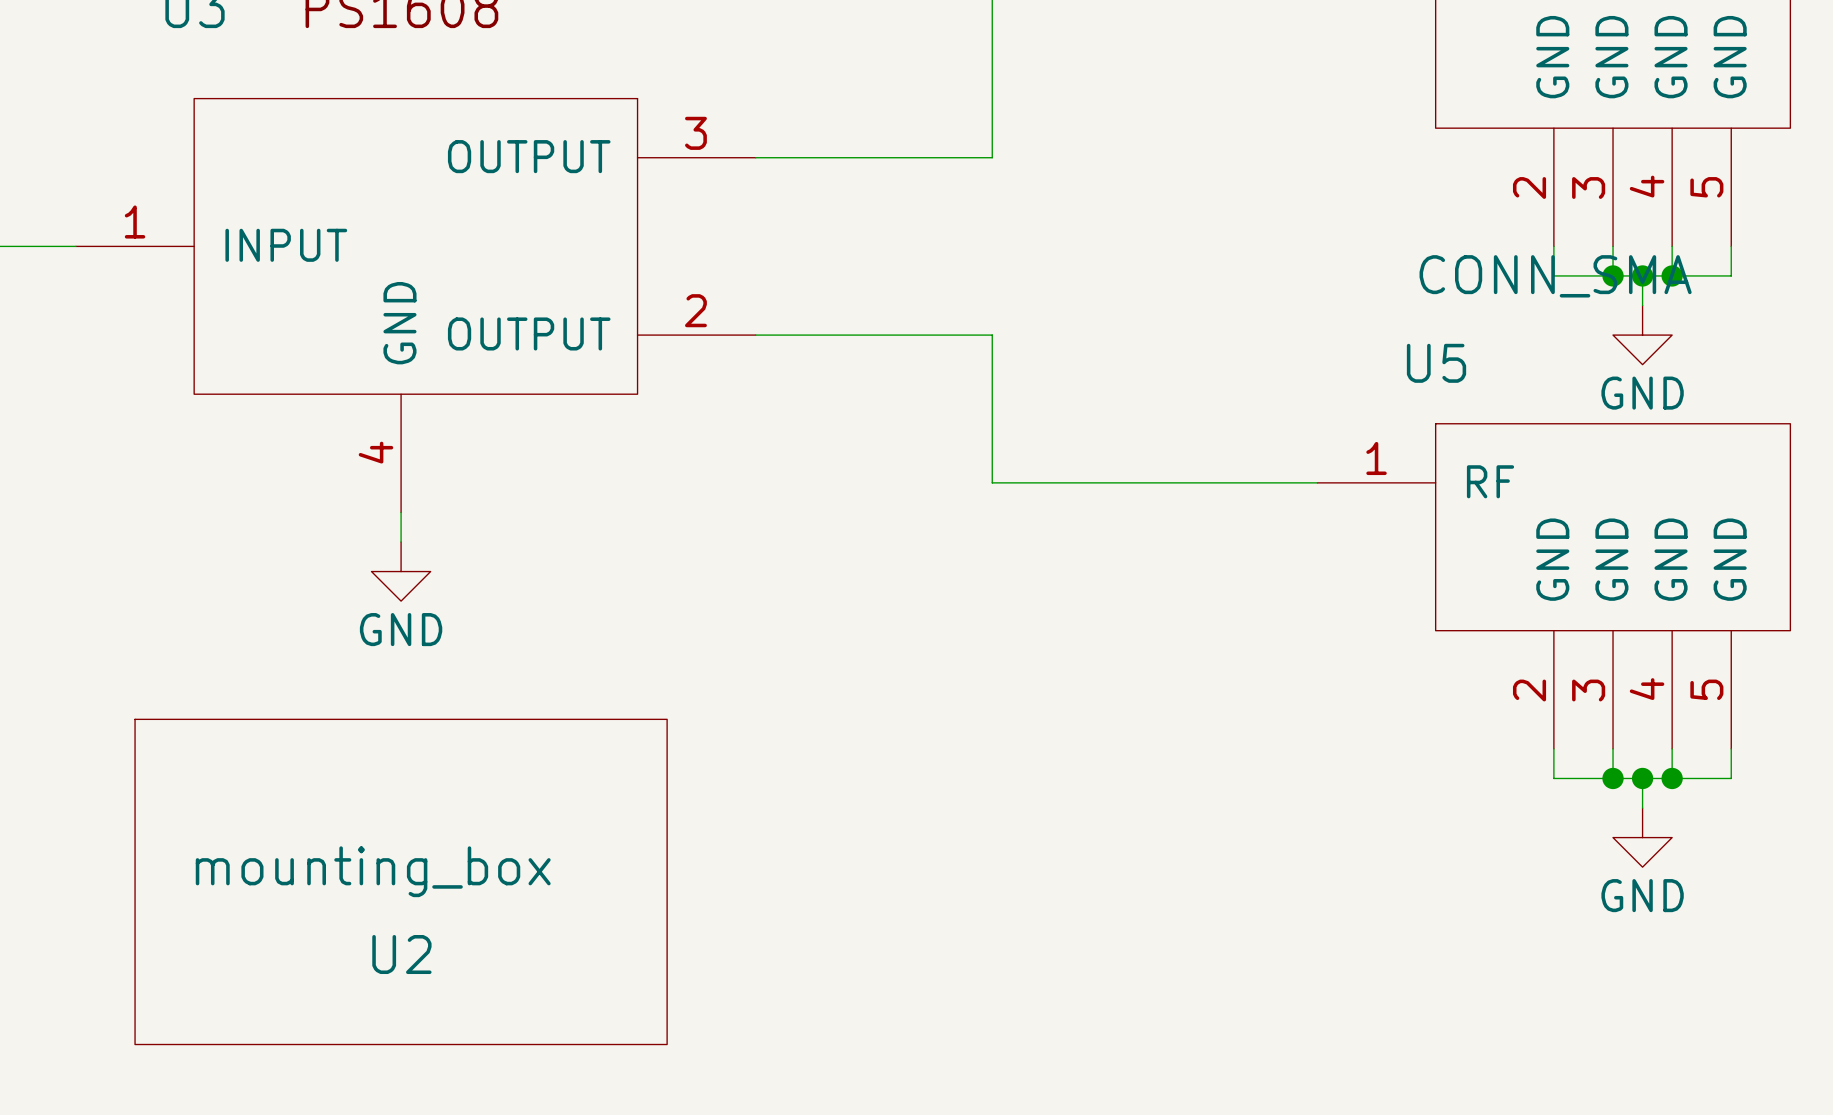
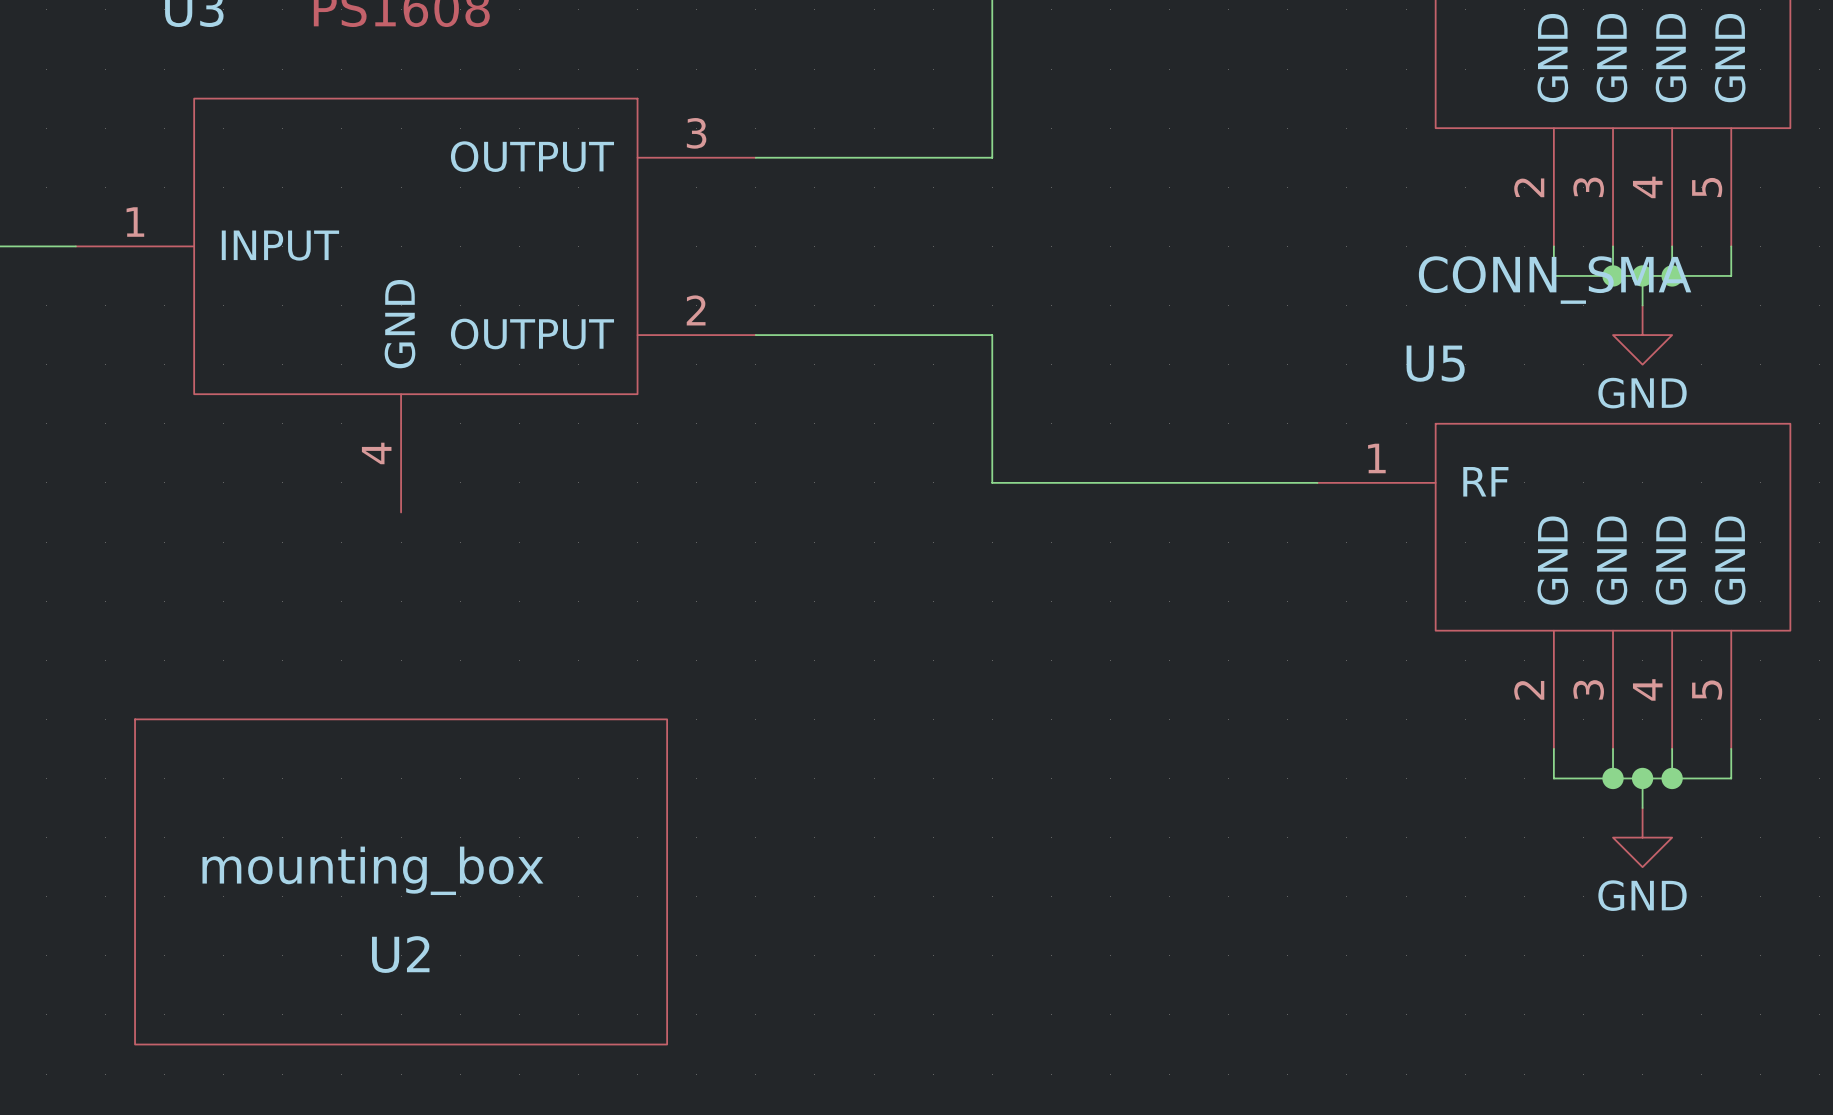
wire: (401, 512) (401, 542) -> none
power symbol: GND (401, 571) -> none

